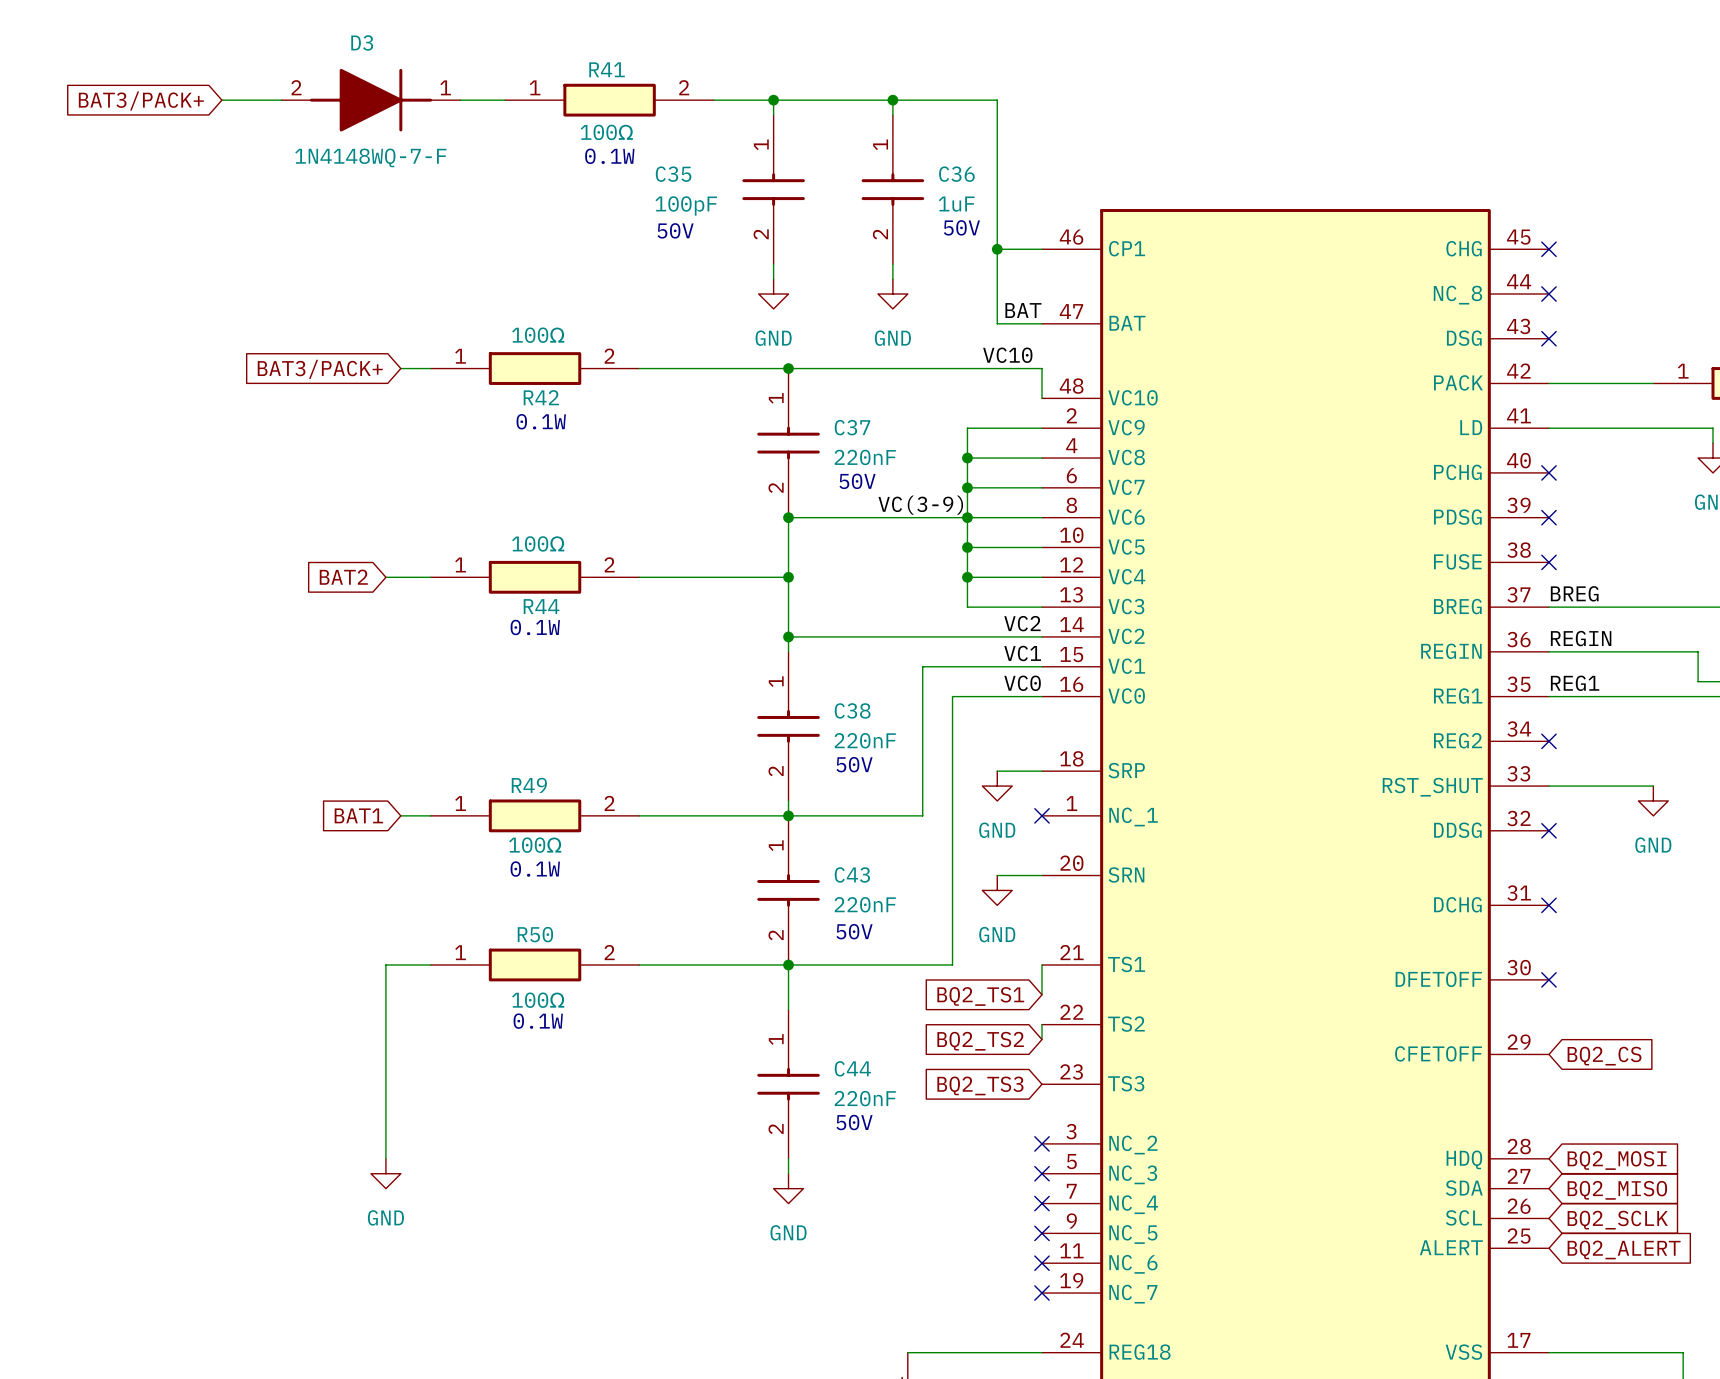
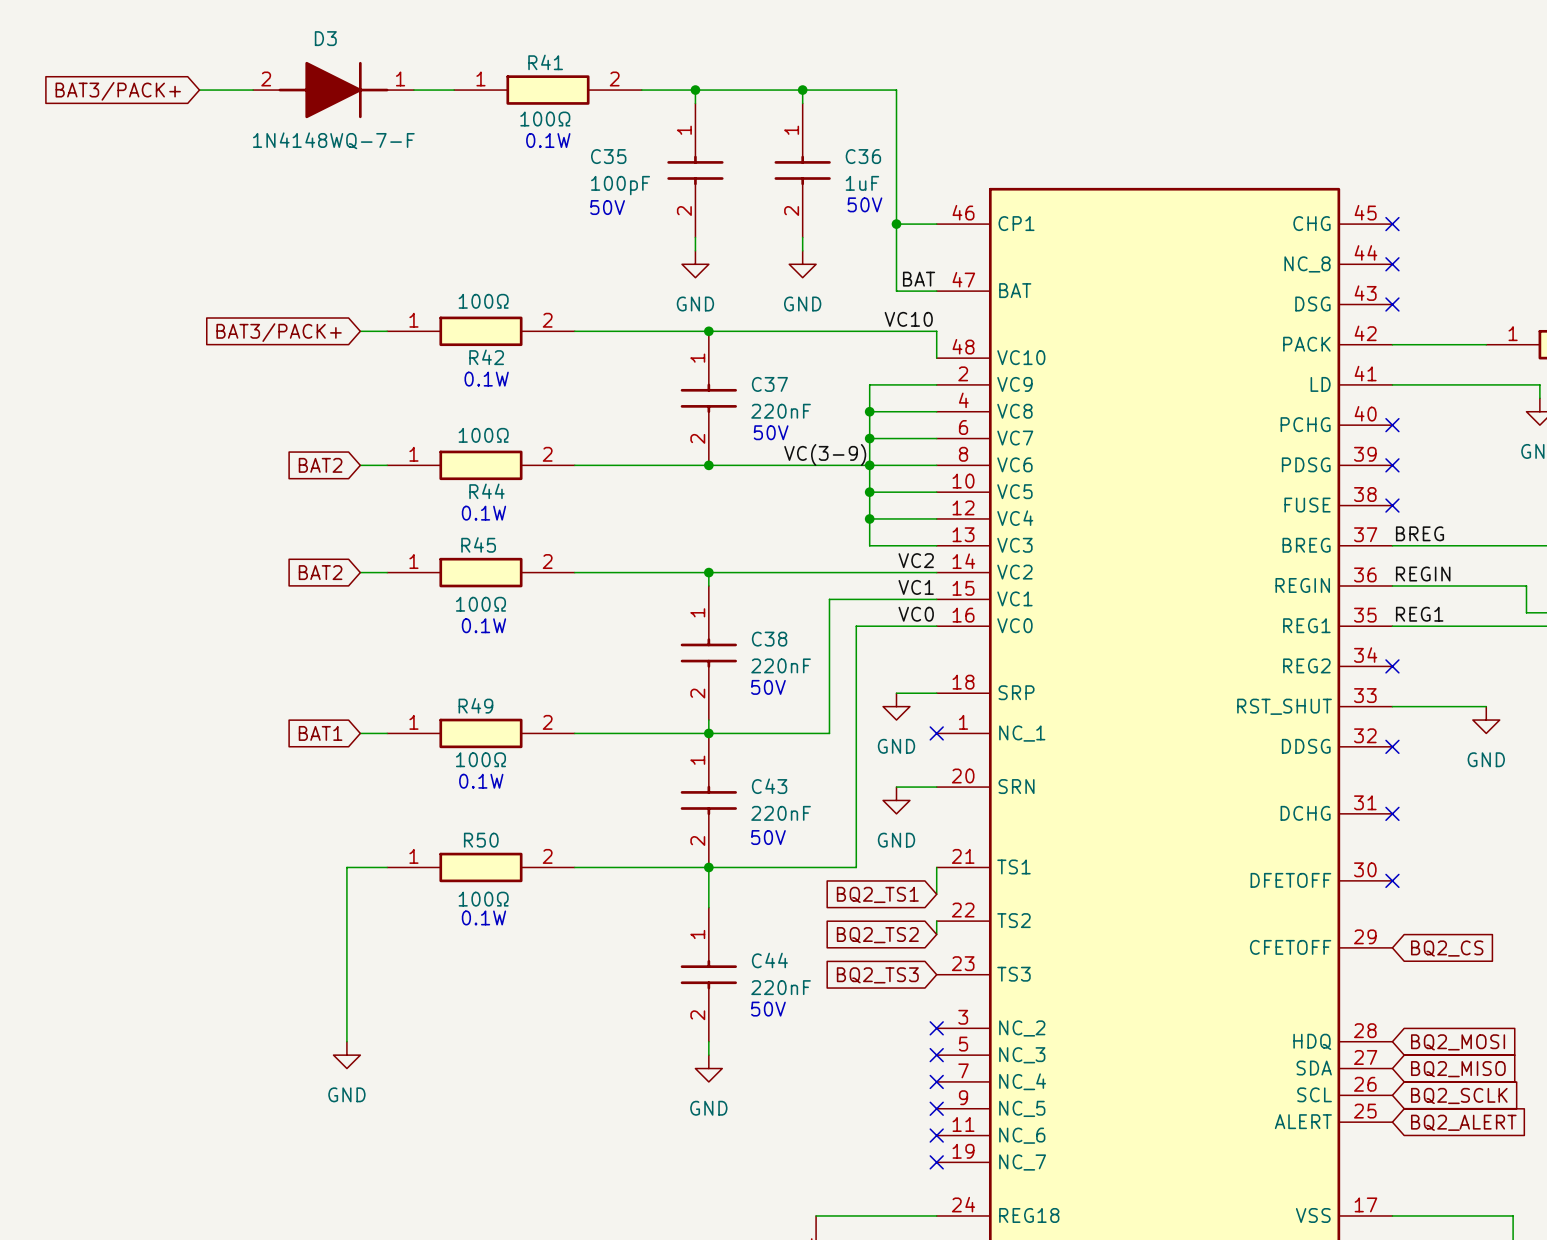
global label: none -> BAT2 (320, 465)
wire: none -> (360, 465) (387, 465)
wire: (788, 517) (788, 636) -> (708, 465) (574, 465)
text: none -> 0.1W (483, 513)
global label: BAT2 (343, 577) -> none
wire: (385, 577) (430, 577) -> none
R44 position: (535, 577) -> (480, 465)
wire: (639, 577) (788, 577) -> (574, 572) (708, 572)
junction: (788, 577) -> none
text: 0.1W (535, 627) -> none
global label: none -> BAT2 (320, 572)
wire: none -> (360, 572) (387, 572)
R45: none -> 100Ω (480, 572)
text: none -> 0.1W (483, 625)

